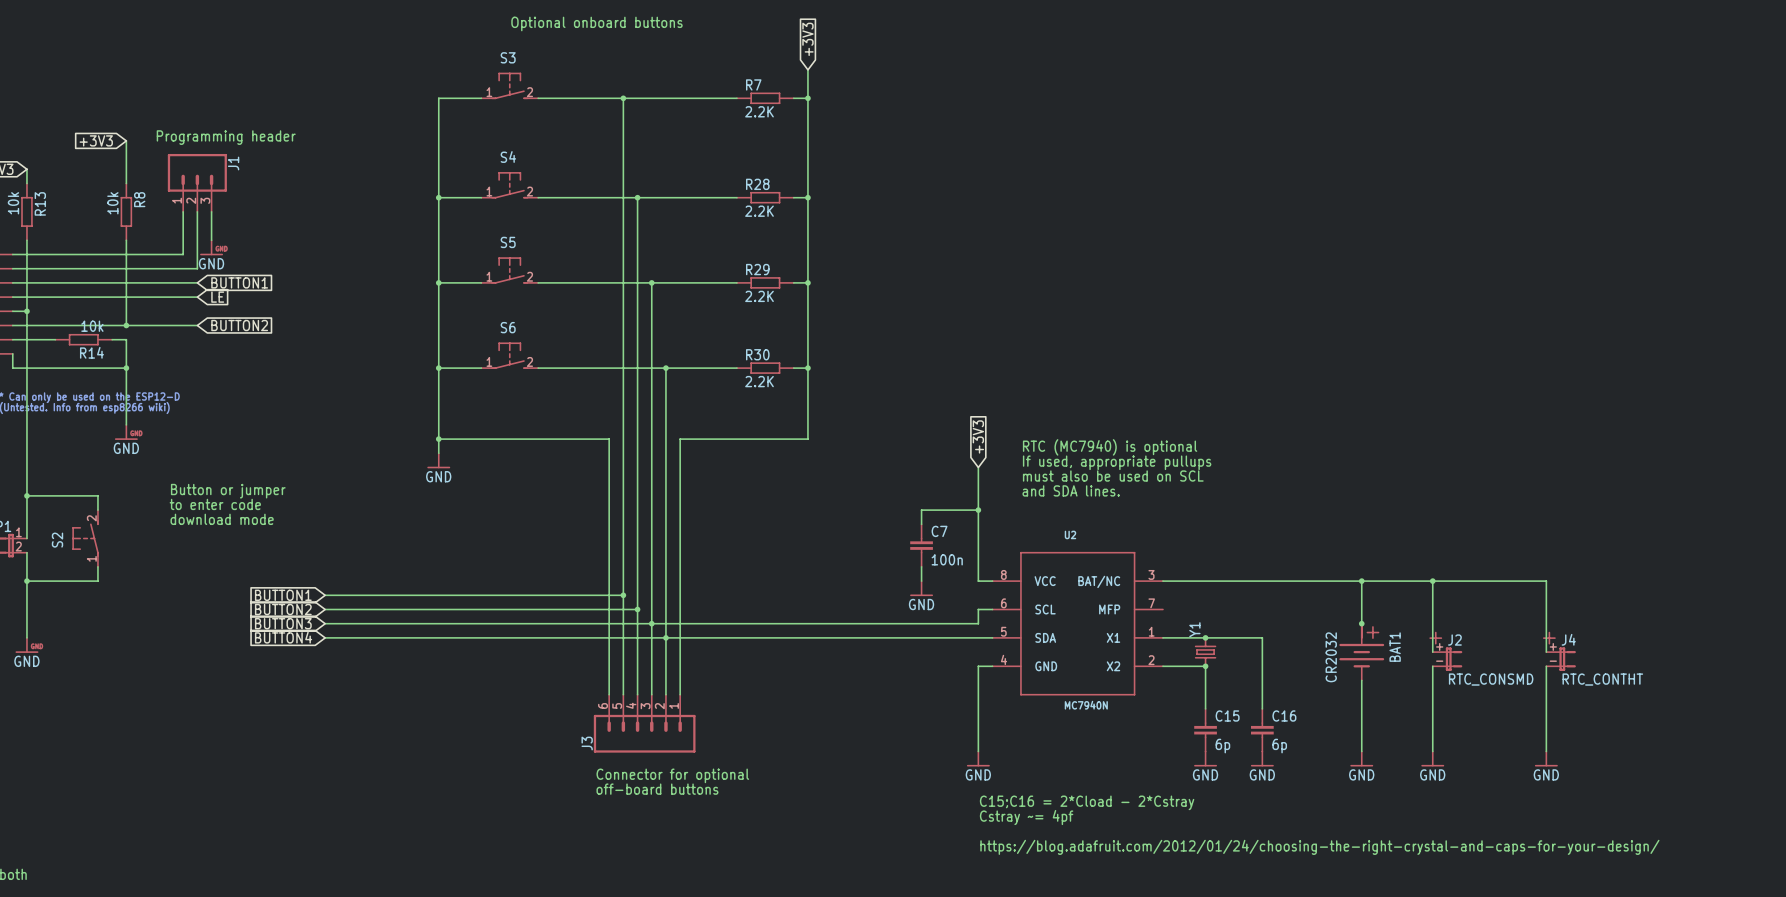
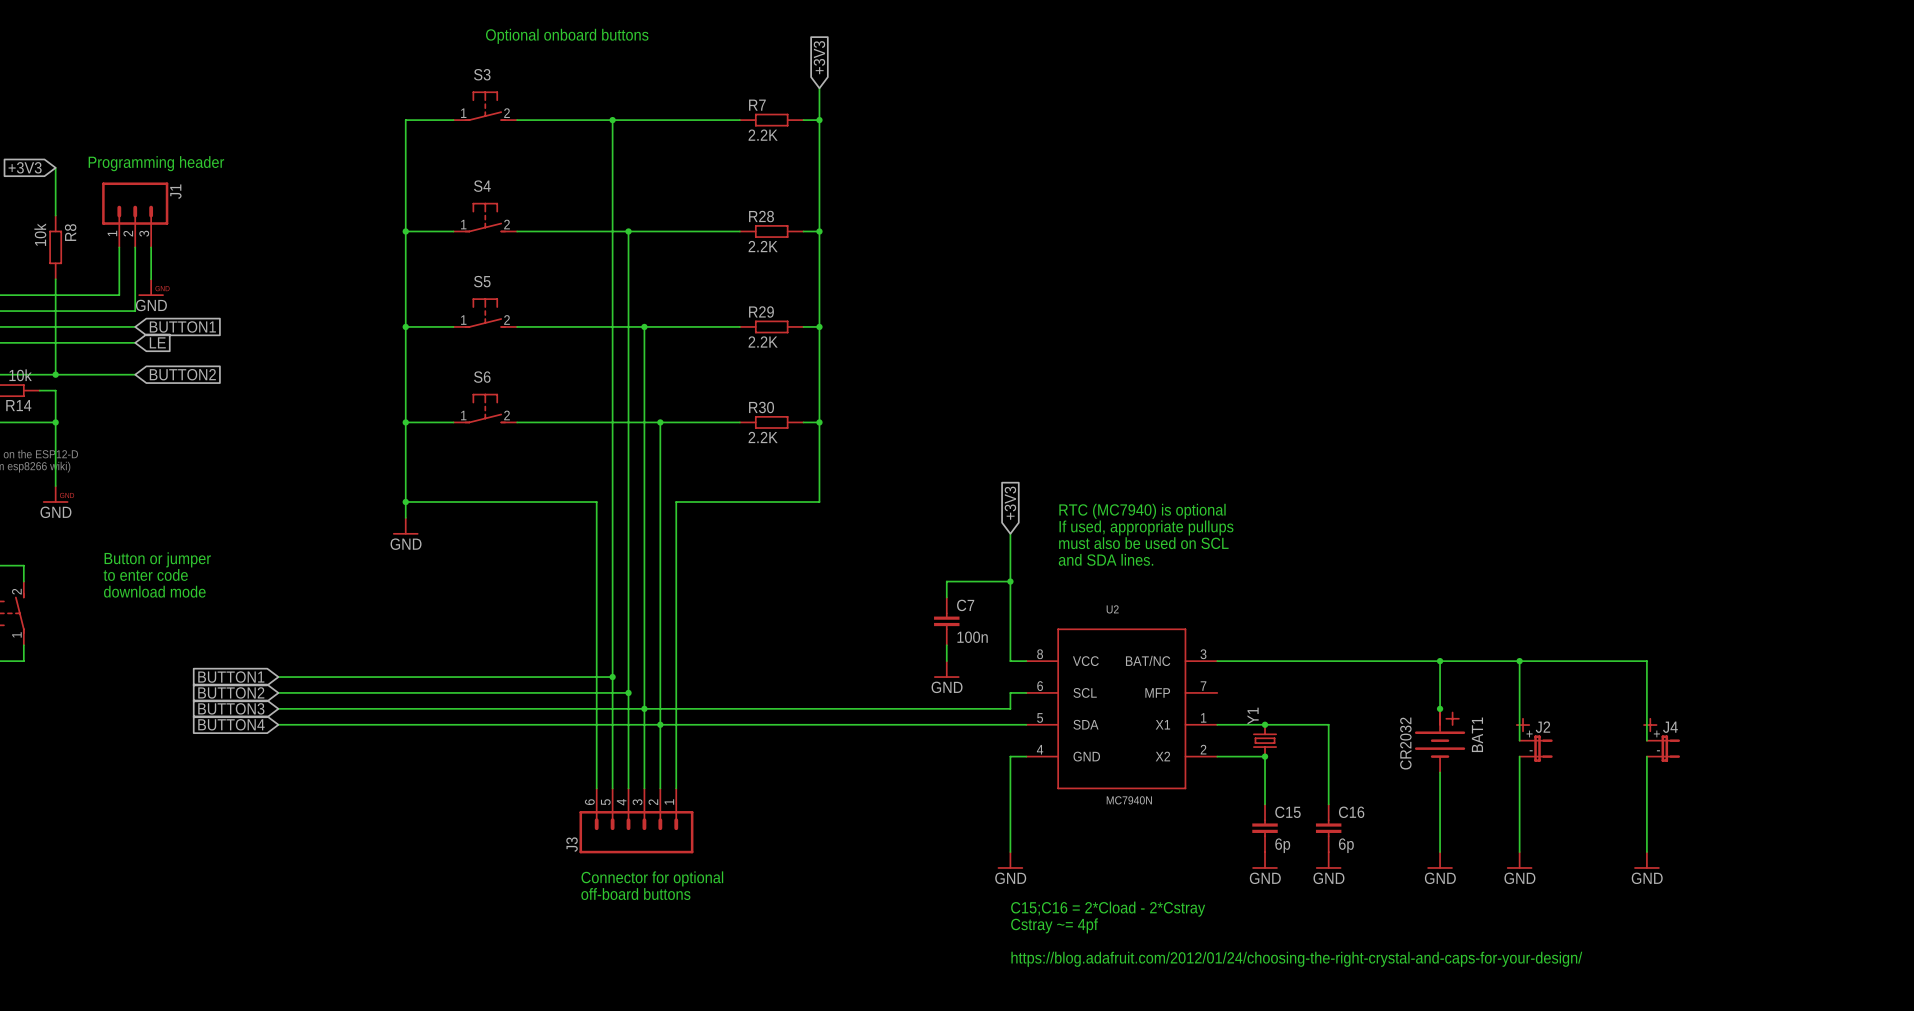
J2 value: RTC_CONSMD (1491, 679) -> none
J4 value: RTC_CONTHT (1602, 679) -> none

